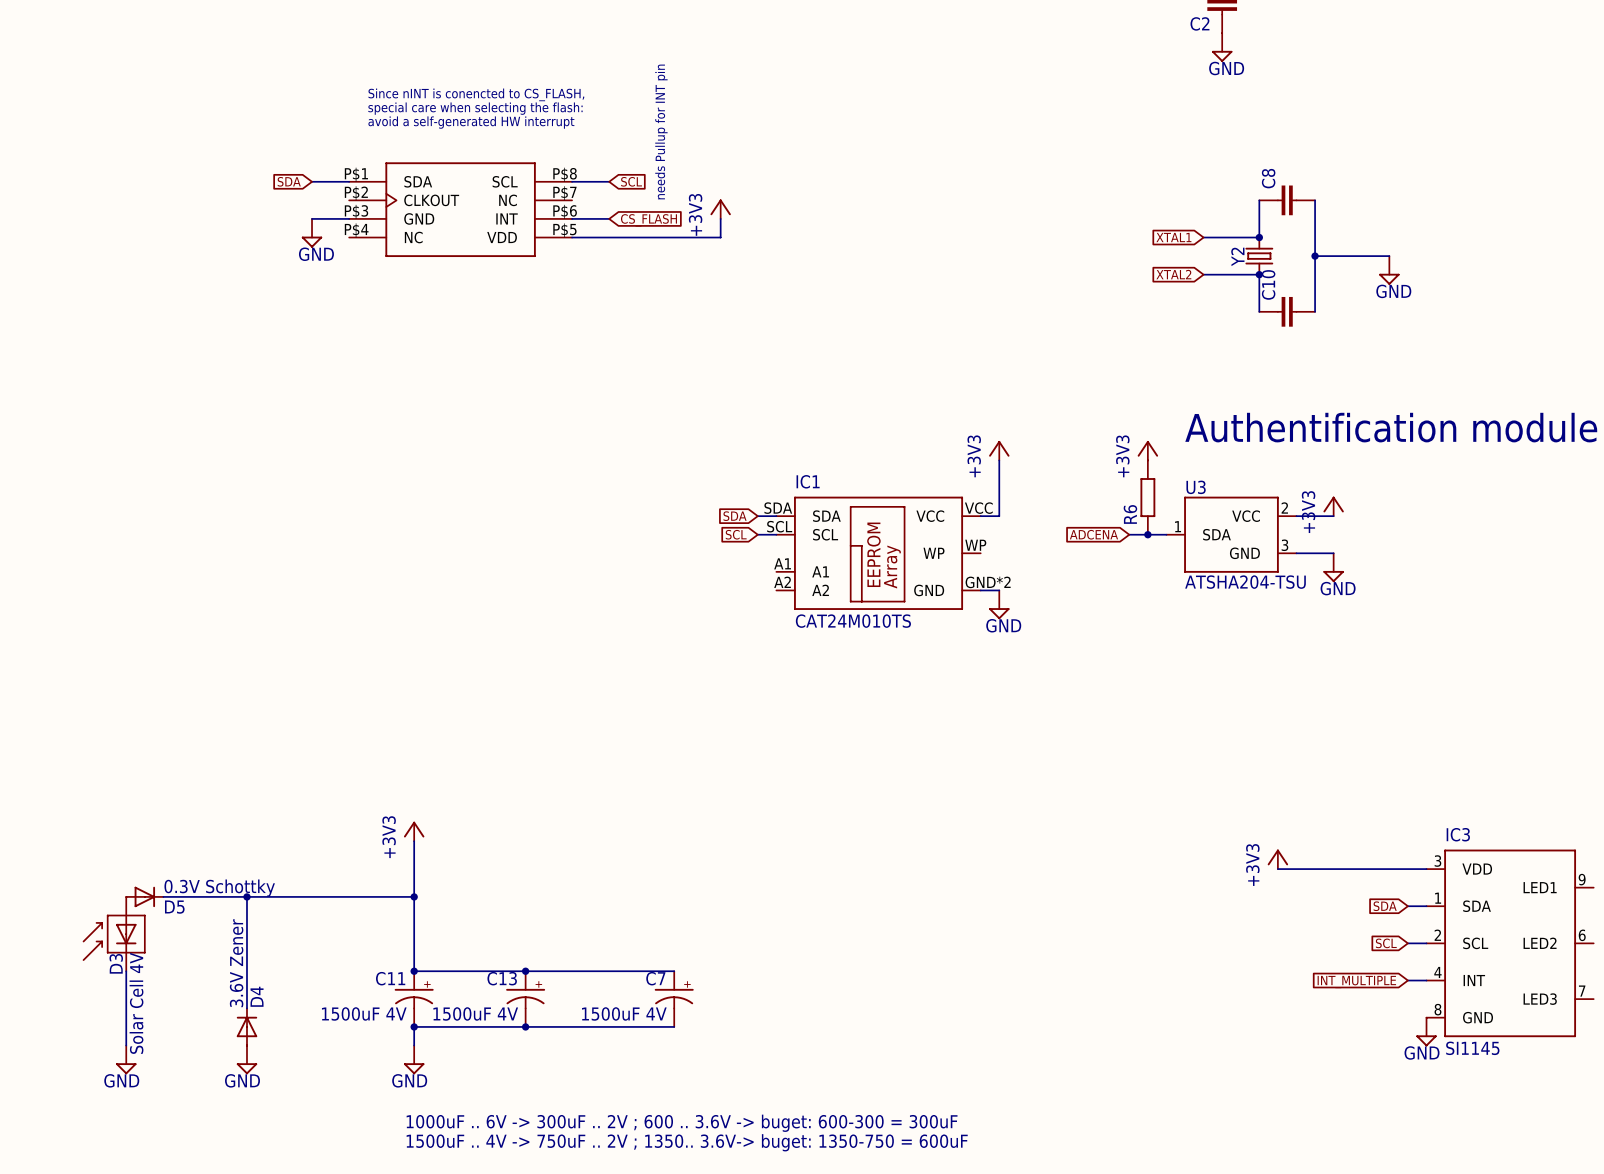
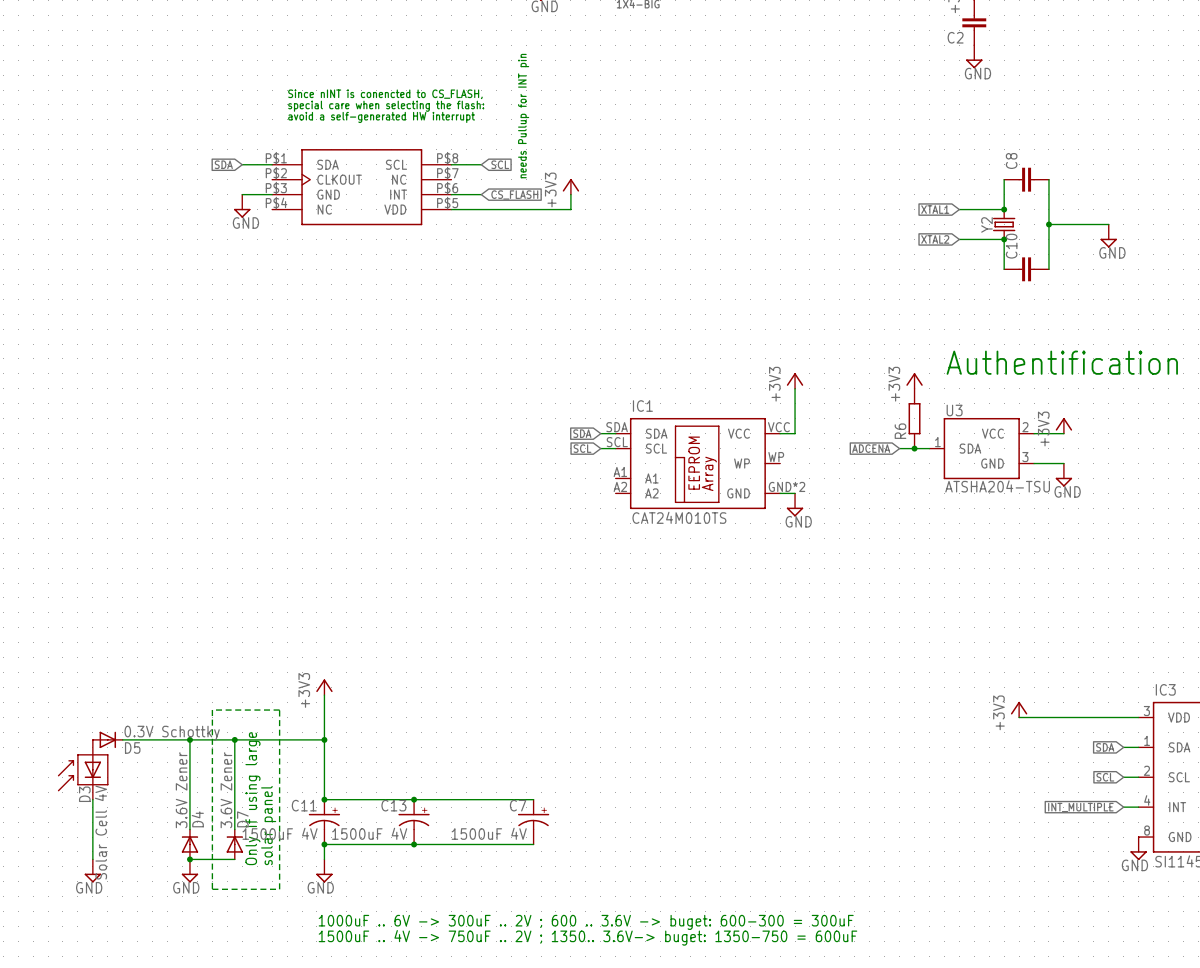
wire: none -> (212, 710) (212, 889) (279, 889) (279, 710) (212, 710)
wire: none -> (234, 739) (234, 829)
junction: none -> (234, 739)
text: none -> Only if using large (252, 798)
text: none -> solar panel (268, 825)
D7: none -> 3.6V Zener (234, 844)
wire: none -> (189, 859) (234, 859)
junction: none -> (189, 859)

